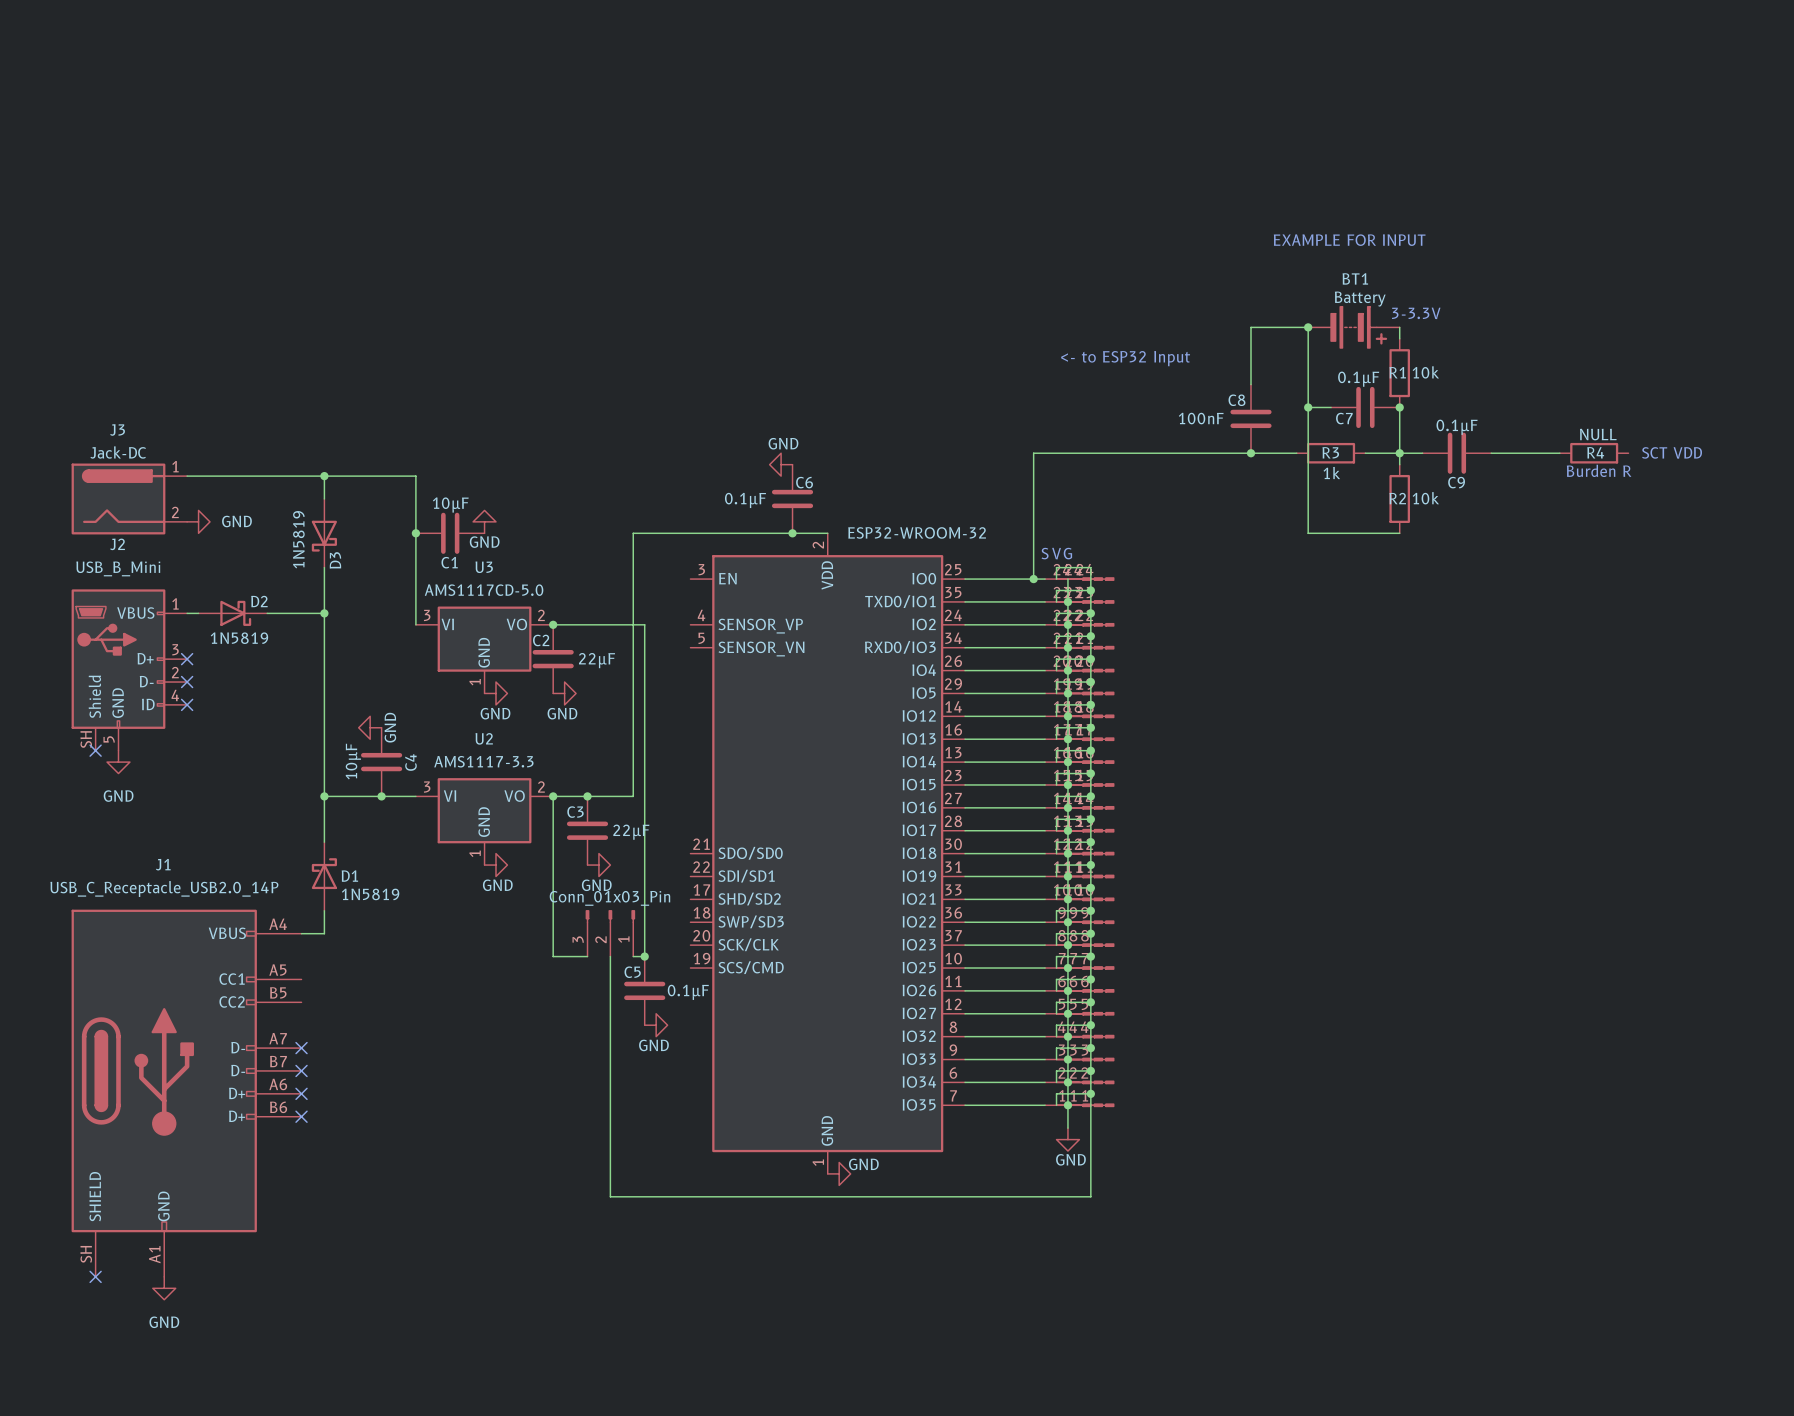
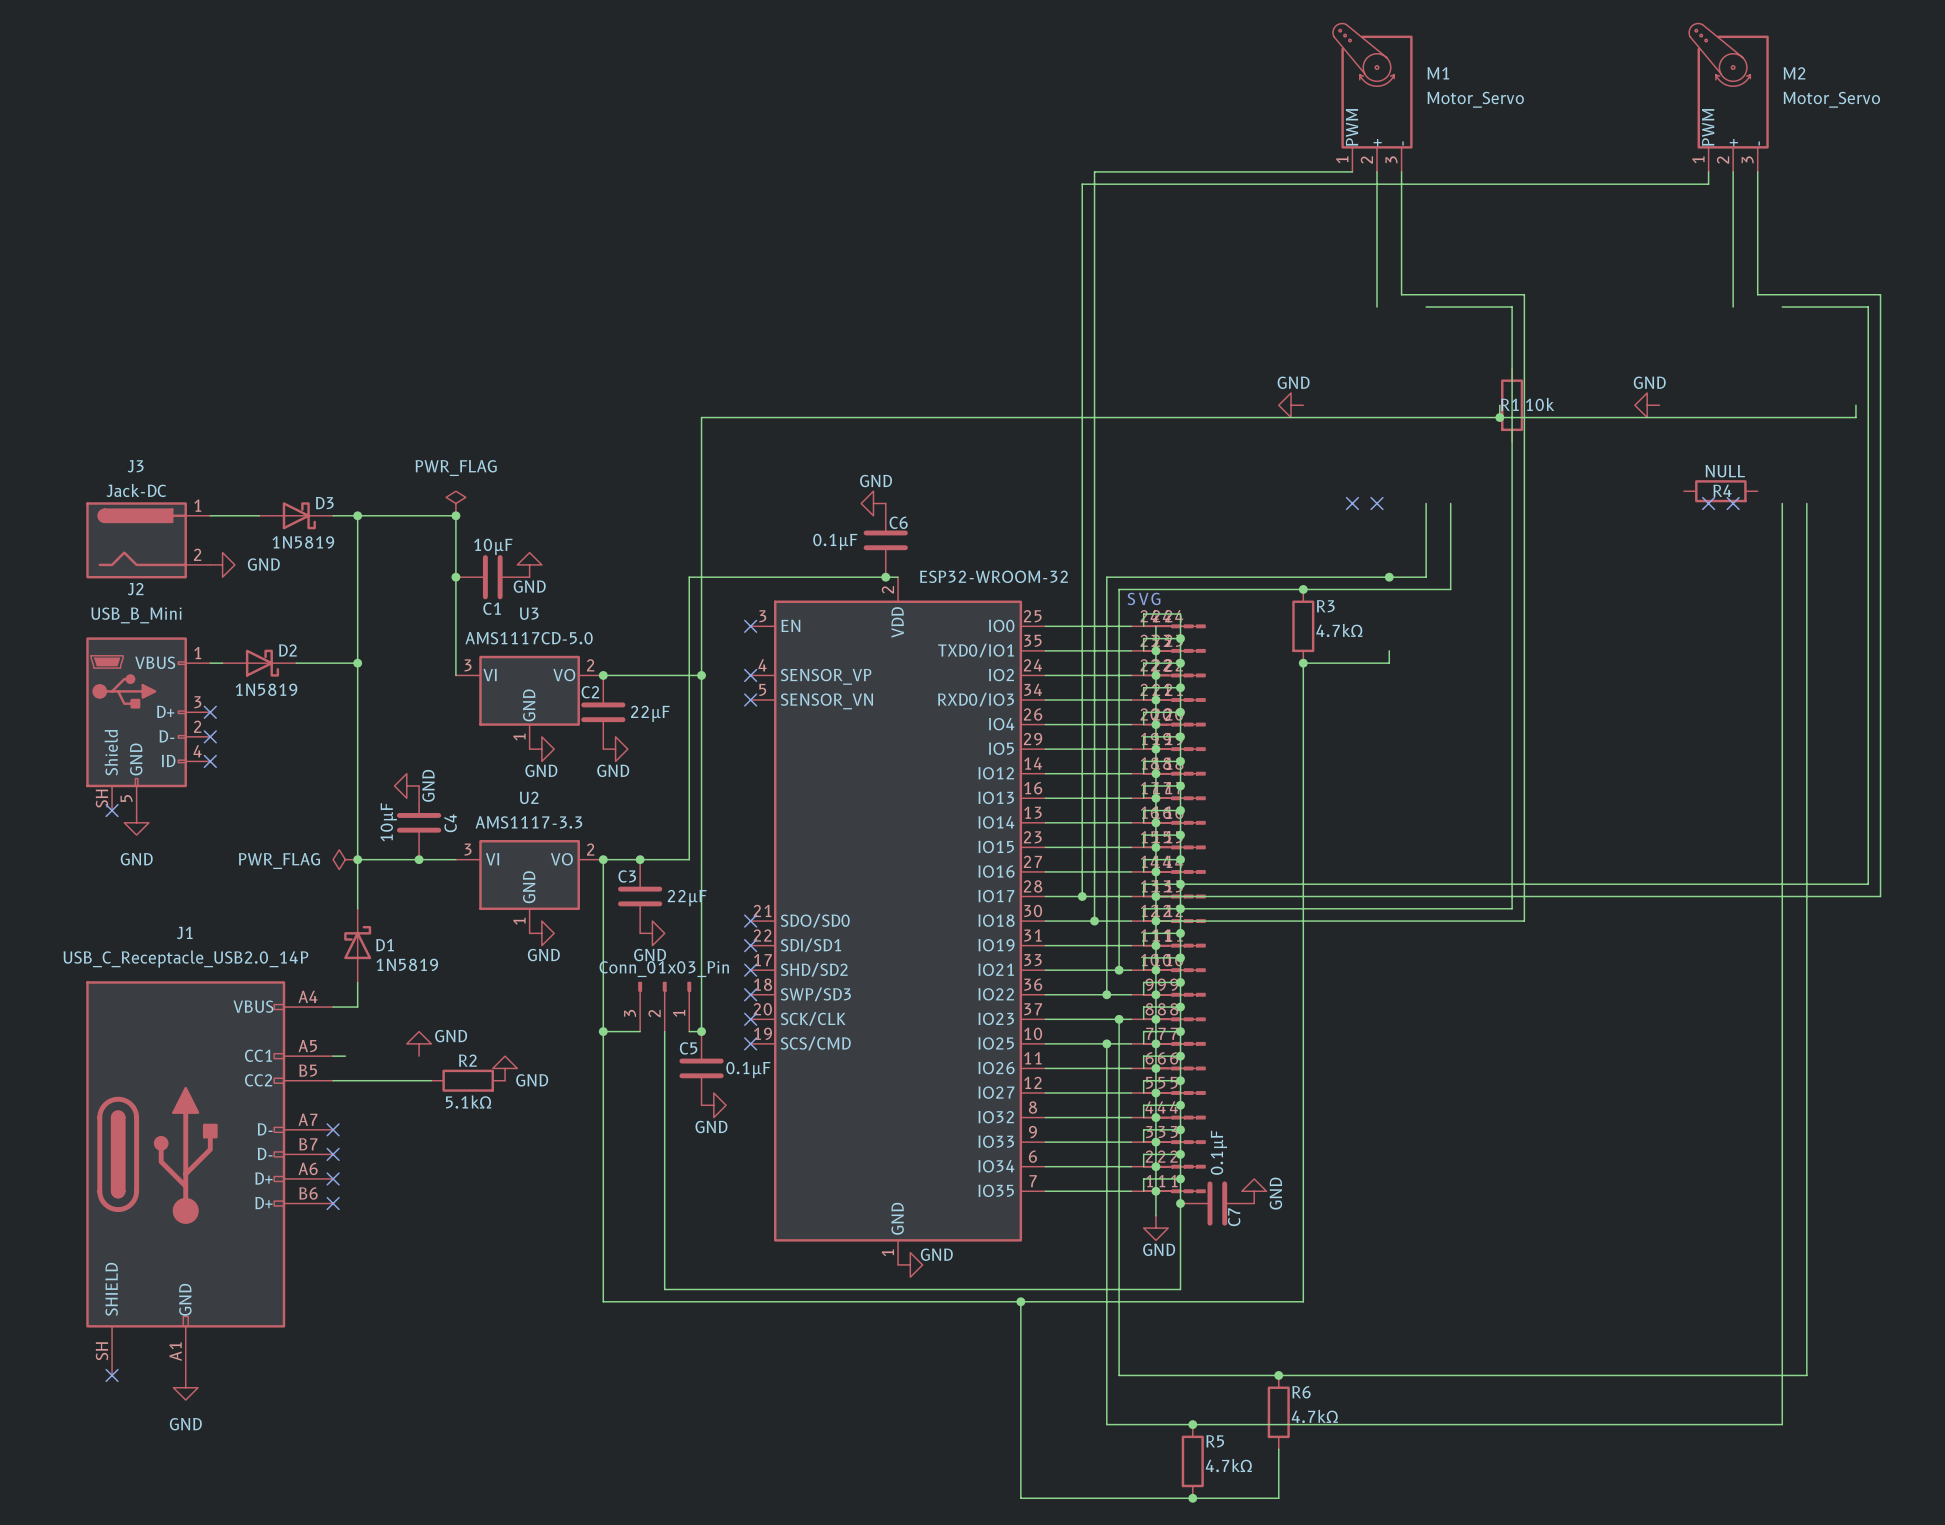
M1: none -> Motor_Servo (1372, 97)
M2: none -> Motor_Servo (1728, 97)
wire: none -> (1352, 171) (1094, 171) (1094, 921)
wire: none -> (1377, 171) (1377, 307)
wire: none -> (1401, 171) (1401, 294) (1524, 294) (1524, 921) (1155, 921)
wire: none -> (1708, 171) (1708, 184) (1082, 184) (1082, 896)
wire: none -> (1733, 171) (1733, 307)
wire: none -> (1757, 171) (1757, 294) (1880, 294) (1880, 896) (1155, 896)
text: EXAMPLE FOR INPUT (1349, 240) -> none
wire: none -> (1426, 307) (1512, 307) (1512, 356)
wire: none -> (1782, 307) (1868, 307) (1868, 884) (1180, 884)
text: 3-3.3V (1416, 313) -> none
junction: (1308, 327) -> none
BT1: Battery (1353, 327) -> none
wire: none -> (1512, 368) (1512, 442)
text: <- to ESP32 Input (1125, 358) -> none
power symbol: none -> GND (1291, 405)
wire: none -> (1499, 405) (1499, 417)
power symbol: none -> GND (1647, 405)
wire: none -> (1855, 405) (1855, 417) (701, 417) (701, 675)
C7 value rotation: 0° (1358, 379) -> 90° counterclockwise (1218, 1152)
wire: (1251, 384) (1251, 327) (1308, 327) (1308, 533) -> (1106, 994) (1106, 577) (1413, 577)
wire: (1308, 407) (1331, 407) -> none
junction: (1308, 407) -> none
C7 position: (1365, 407) -> (1217, 1203)
junction position: (1399, 407) -> (1499, 417)
C8: 100nF (1251, 418) -> none
C7 name rotation: 0° (1344, 418) -> 90° counterclockwise (1234, 1217)
C7 name position: C7 (1344, 418) -> C7 (1234, 1217)
R3 name position: R3 (1330, 452) -> R3 (1325, 606)
text: SCT VDD (1672, 452) -> none
junction: (1251, 453) -> none
wire: (1296, 453) (1033, 453) (1033, 544) -> (1450, 503) (1450, 589) (1119, 589)
R3 rotation: 0° (1331, 453) -> 90° clockwise (1303, 626)
R3 position: (1331, 453) -> (1303, 626)
wire: (1365, 453) (1422, 453) -> none
junction: (1399, 453) -> none
C9: 0.1µF (1456, 453) -> none
wire: (1491, 453) (1559, 453) -> none
power symbol: none -> PWR_FLAG (455, 503)
power symbol position: GND (781, 464) -> GND (873, 503)
no-connect mark: none -> (1352, 503)
no-connect mark: none -> (1377, 503)
wire: none -> (1512, 503) (1512, 908) (1180, 908)
no-connect mark: none -> (1708, 503)
no-connect mark: none -> (1733, 503)
wire: none -> (1782, 503) (1782, 1424) (1106, 1424) (1106, 1043)
wire: none -> (1806, 503) (1806, 1375) (1119, 1375) (1119, 1019)
text: Burden R (1599, 470) -> none
R3 value: 1k (1331, 473) -> 4.7kΩ (1339, 630)
junction: none -> (455, 515)
C6 position: (792, 498) -> (885, 540)
R2 name position: R2 (1397, 498) -> R2 (467, 1060)
R2 rotation: 0° (1399, 498) -> 90° clockwise (468, 1080)
R2 position: (1399, 498) -> (468, 1080)
R2 value: 10k (1425, 498) -> 5.1kΩ (468, 1102)
D3 position: (324, 533) -> (296, 515)
junction position: (792, 533) -> (885, 577)
junction: none -> (1389, 577)
wire: (1319, 533) (1399, 533) -> (1426, 577) (1426, 503)
D3 rotation: 0° (324, 536) -> 90° counterclockwise (299, 515)
junction: none -> (1303, 589)
no-connect mark: none -> (750, 626)
wire: none -> (1119, 626) (1119, 970)
junction: (1033, 579) -> none
wire: none -> (1389, 650) (1389, 663) (1303, 663) (1303, 1301) (603, 1301) (603, 1031)
junction: none -> (1303, 663)
junction: none -> (701, 675)
no-connect mark: none -> (750, 675)
no-connect mark: none -> (750, 700)
power symbol: none -> PWR_FLAG (345, 859)
junction: none -> (1082, 896)
no-connect mark: none -> (750, 921)
junction: none -> (1094, 921)
no-connect mark: none -> (750, 945)
no-connect mark: none -> (750, 970)
junction: none -> (1119, 970)
no-connect mark: none -> (750, 994)
junction: none -> (1106, 994)
no-connect mark: none -> (750, 1019)
junction: none -> (1119, 1019)
junction: none -> (603, 1031)
power symbol: none -> GND (419, 1043)
no-connect mark: none -> (750, 1043)
junction: none -> (1106, 1043)
wire: none -> (333, 1056) (345, 1056)
power symbol: none -> GND (505, 1068)
wire: none -> (333, 1080) (431, 1080)
power symbol: none -> GND (1254, 1191)
junction: none -> (1180, 1203)
wire: none -> (1020, 1301) (1020, 1498) (1278, 1498) (1278, 1449)
junction: none -> (1020, 1301)
junction: none -> (1278, 1375)
R6: none -> 4.7kΩ (1278, 1412)
junction: none -> (1192, 1424)
R5: none -> 4.7kΩ (1192, 1461)
junction: none -> (1192, 1498)

